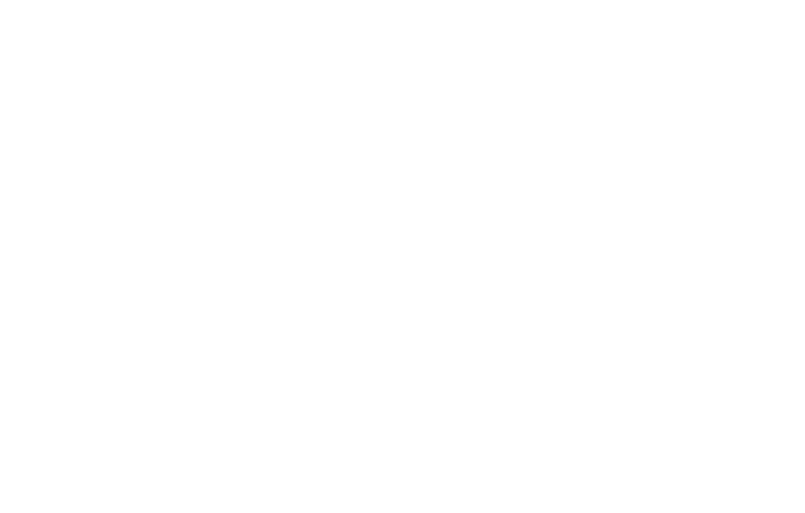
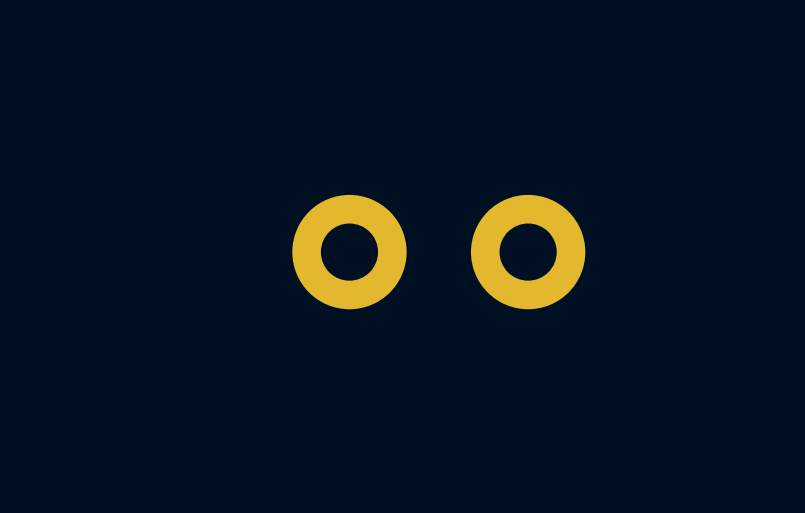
part: none -> (438, 252)

